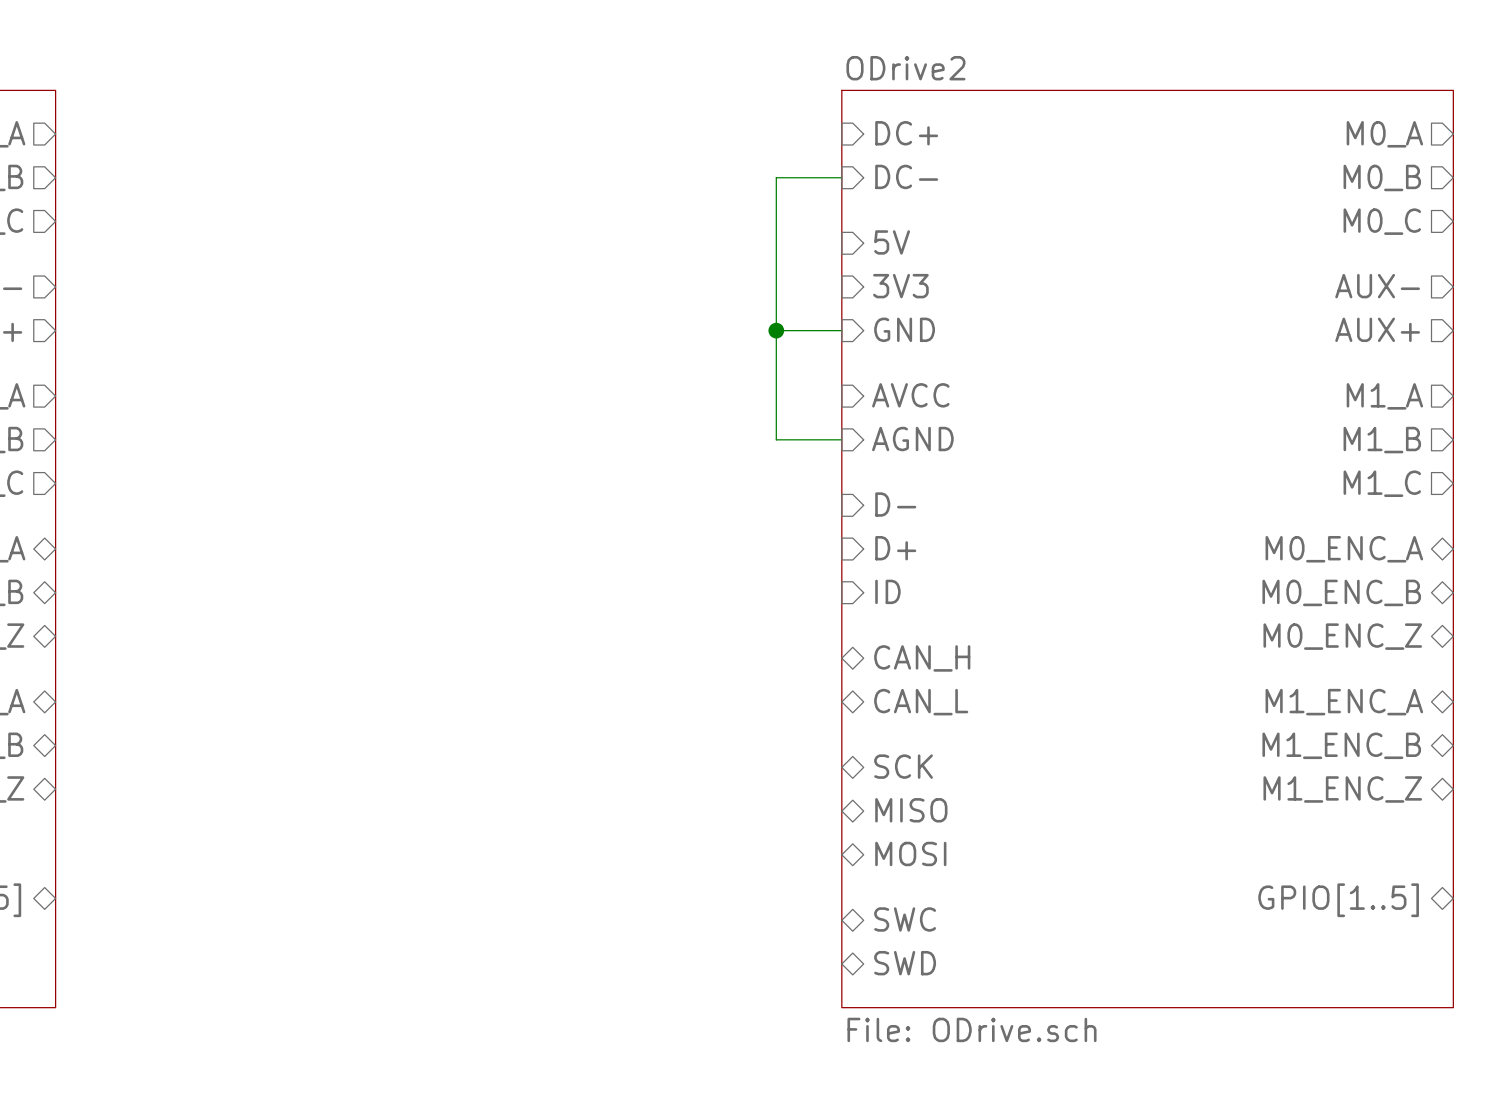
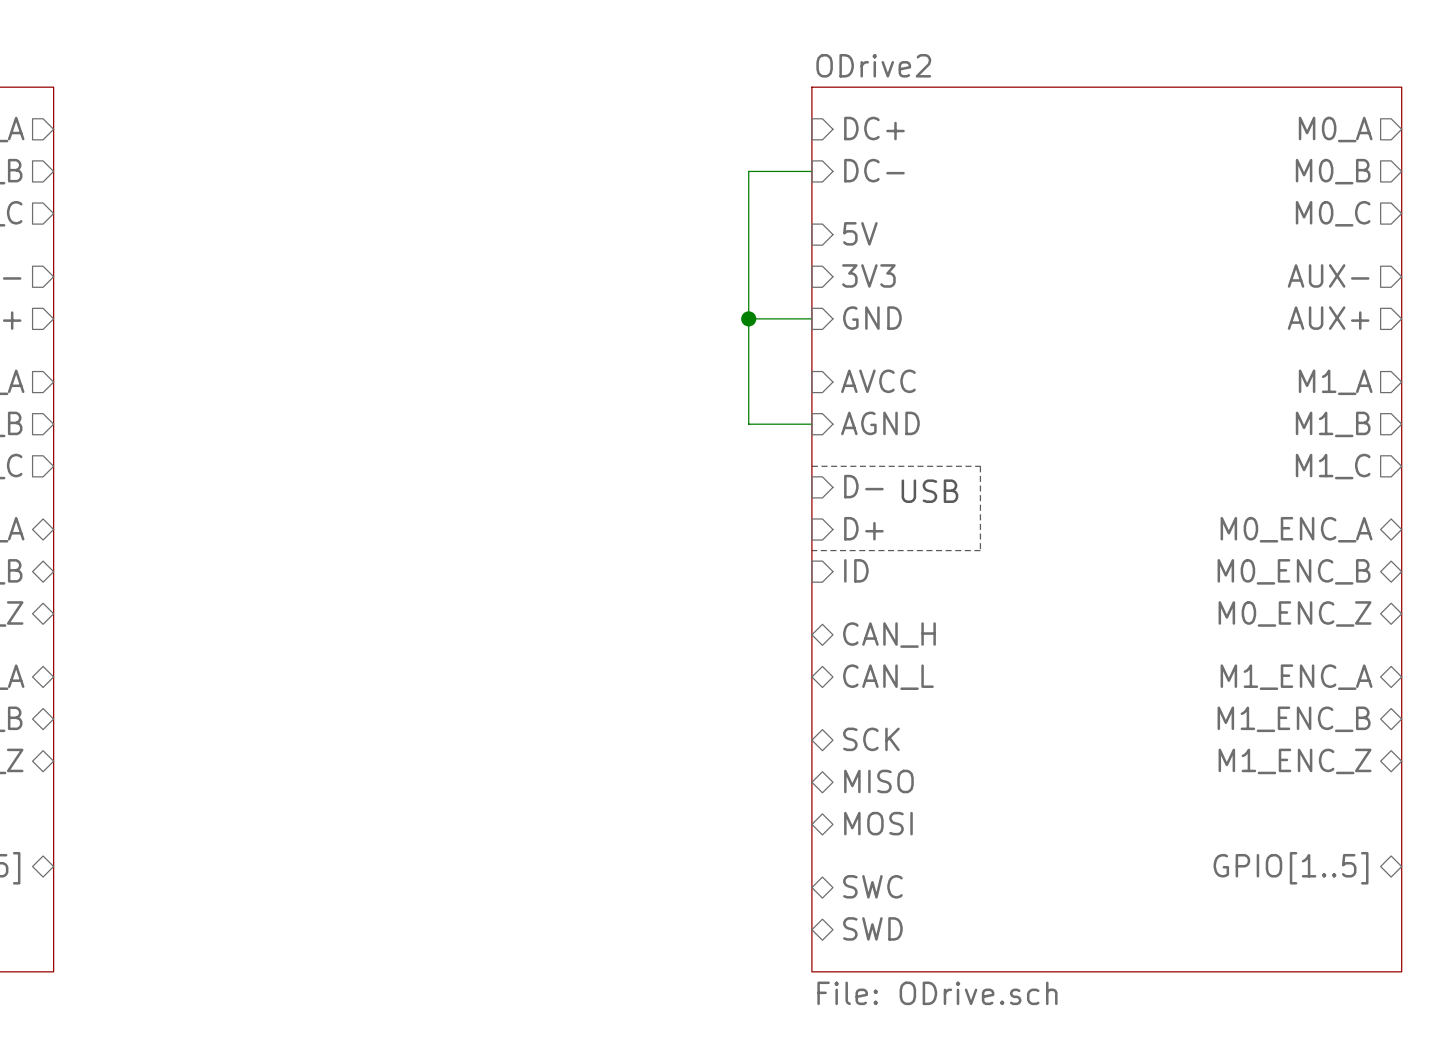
line: none -> (811, 466) (980, 466) (980, 550) (811, 550)
text: none -> USB (929, 491)

